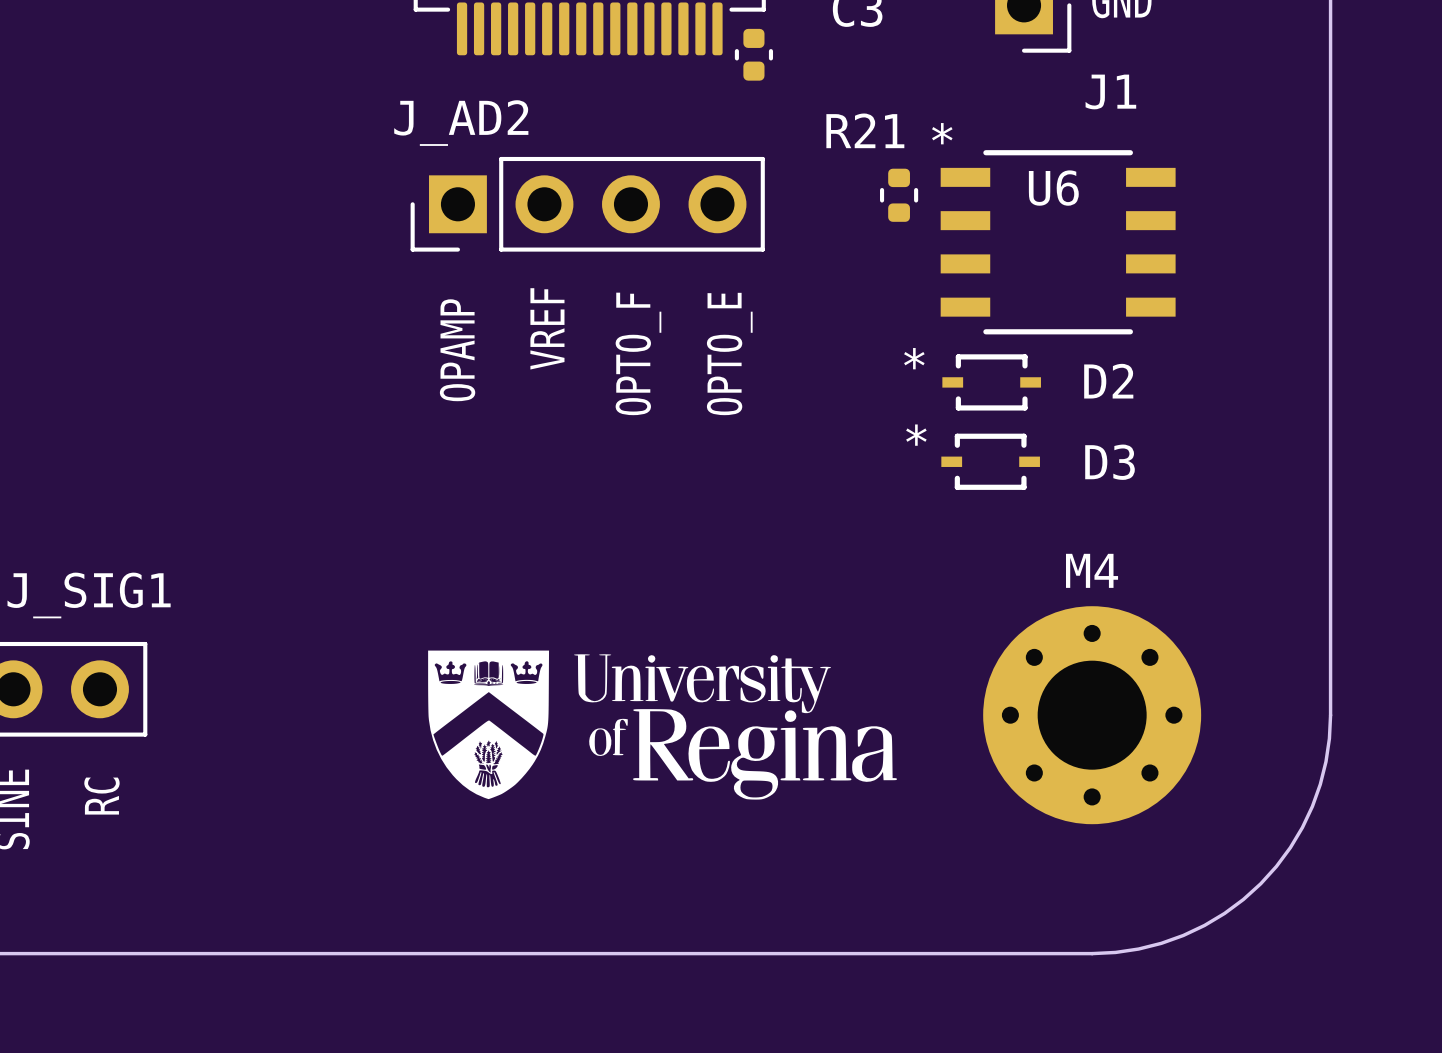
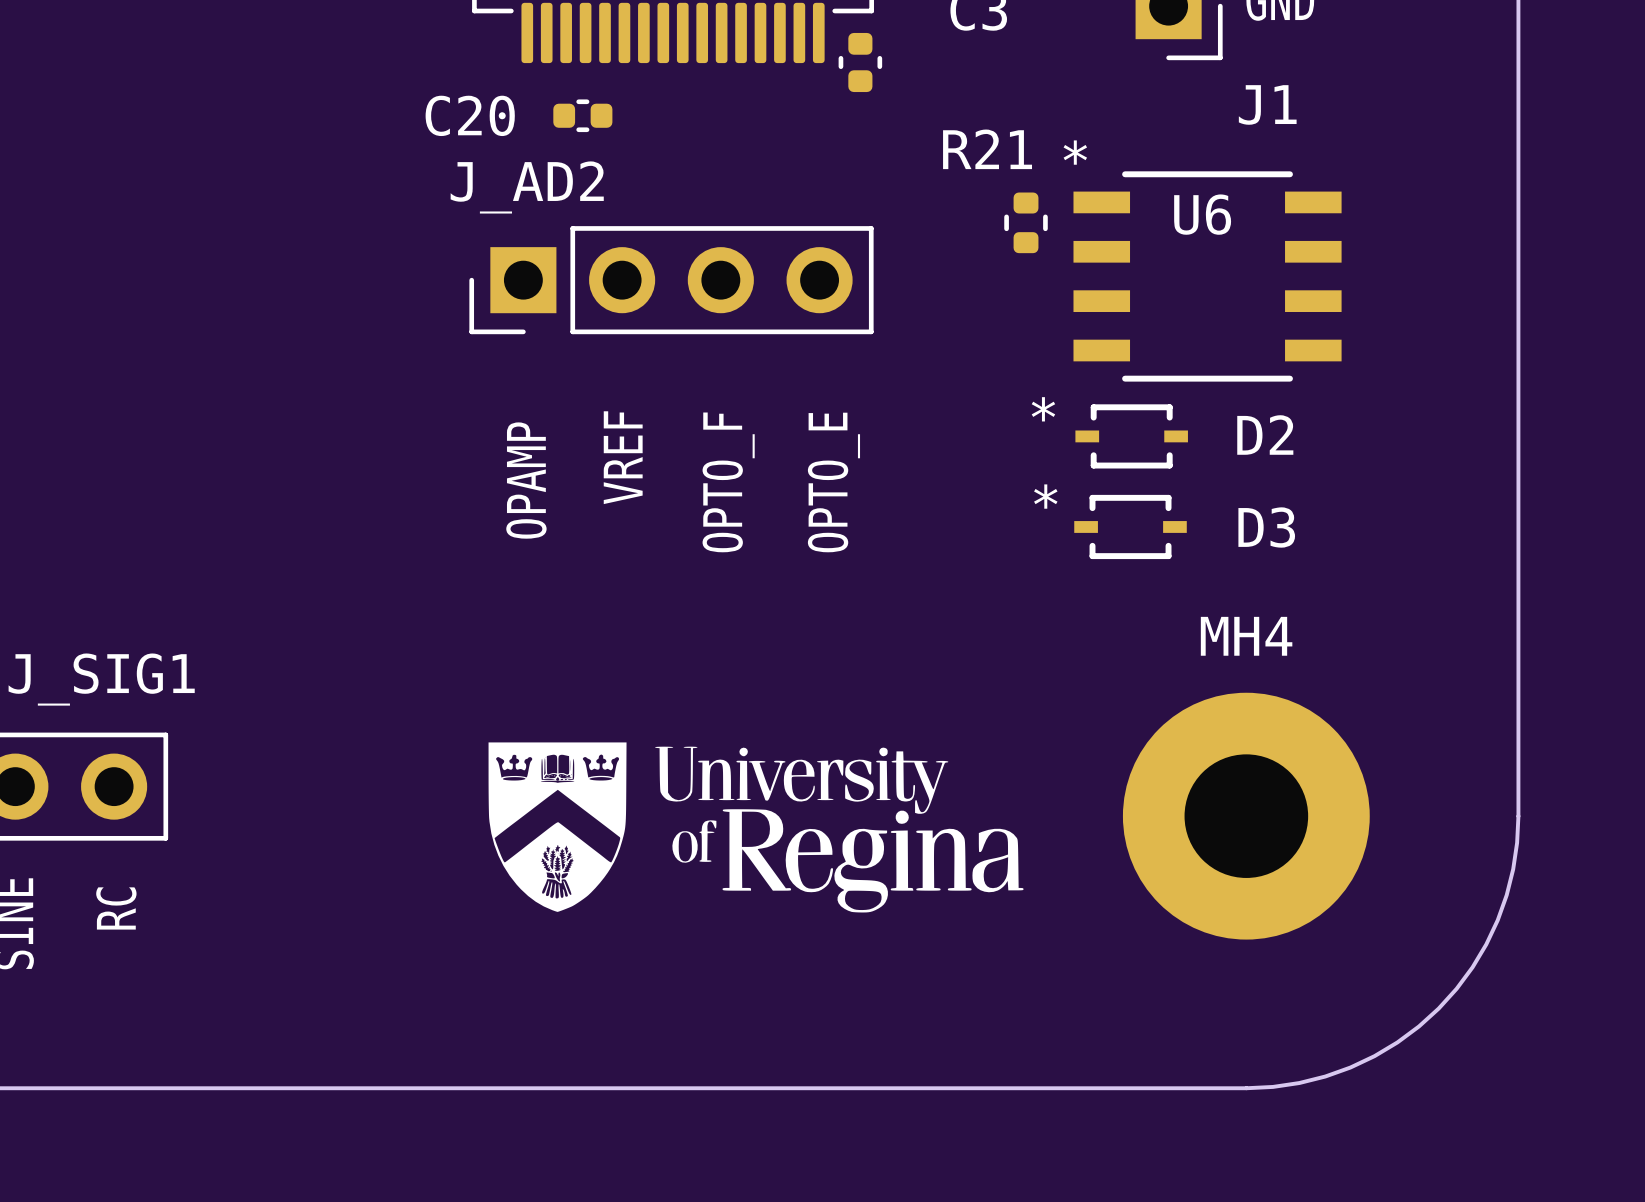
C20: none -> (582, 115)
J_AD2 position: (587, 204) -> (671, 280)
text position: VREF (547, 328) -> VREF (623, 457)
text position: OPAMP (457, 350) -> OPAMP (526, 480)
text position: OPTO_F (638, 353) -> OPTO_F (728, 482)
text position: OPTO_E (729, 353) -> OPTO_E (833, 482)
M4: (1092, 715) -> none
MH4: none -> (1246, 816)

